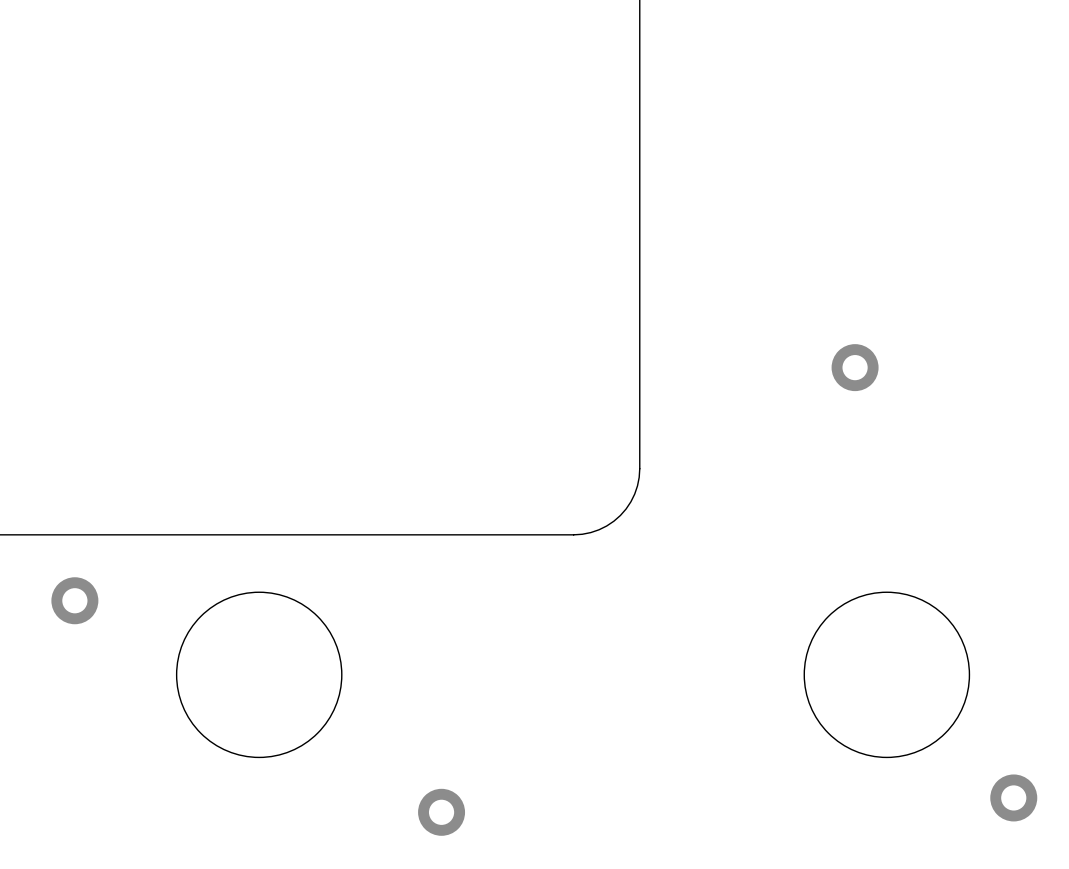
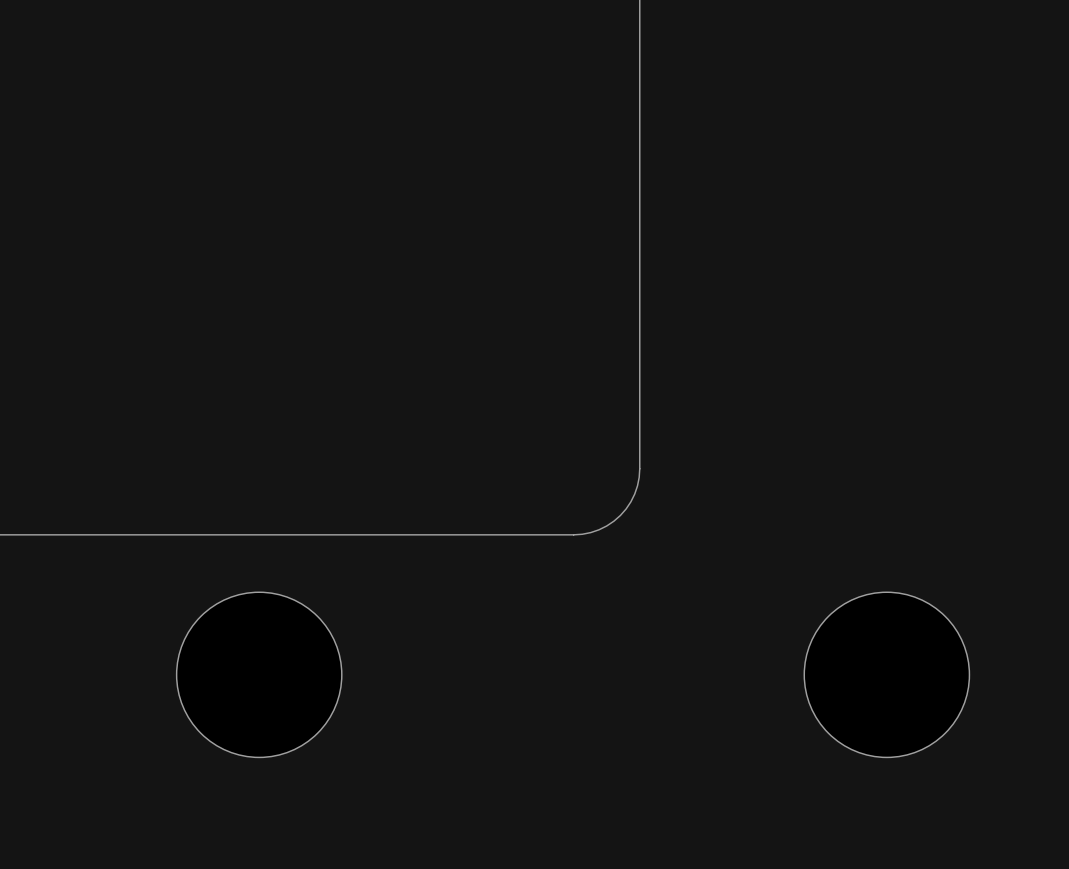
via: (855, 367) -> none
via: (74, 600) -> none
via: (1013, 797) -> none
via: (441, 812) -> none

